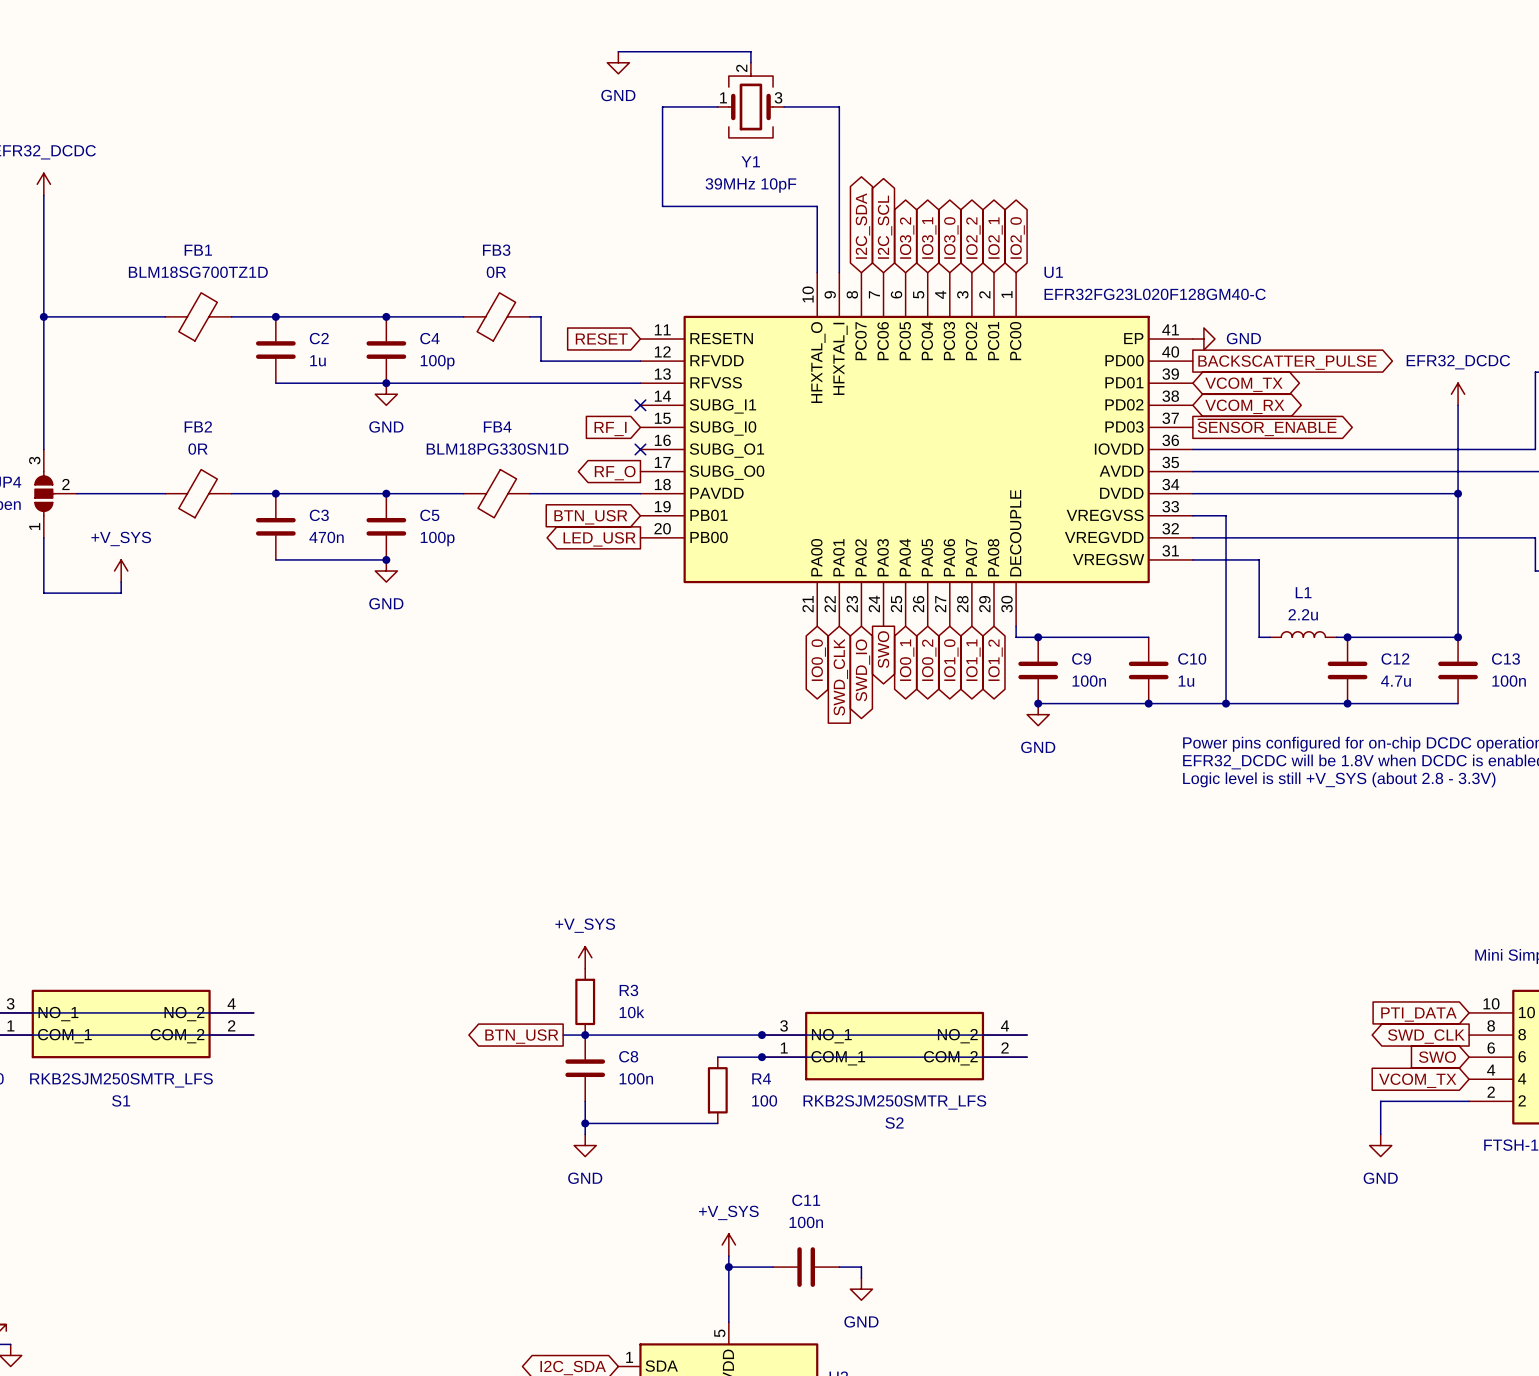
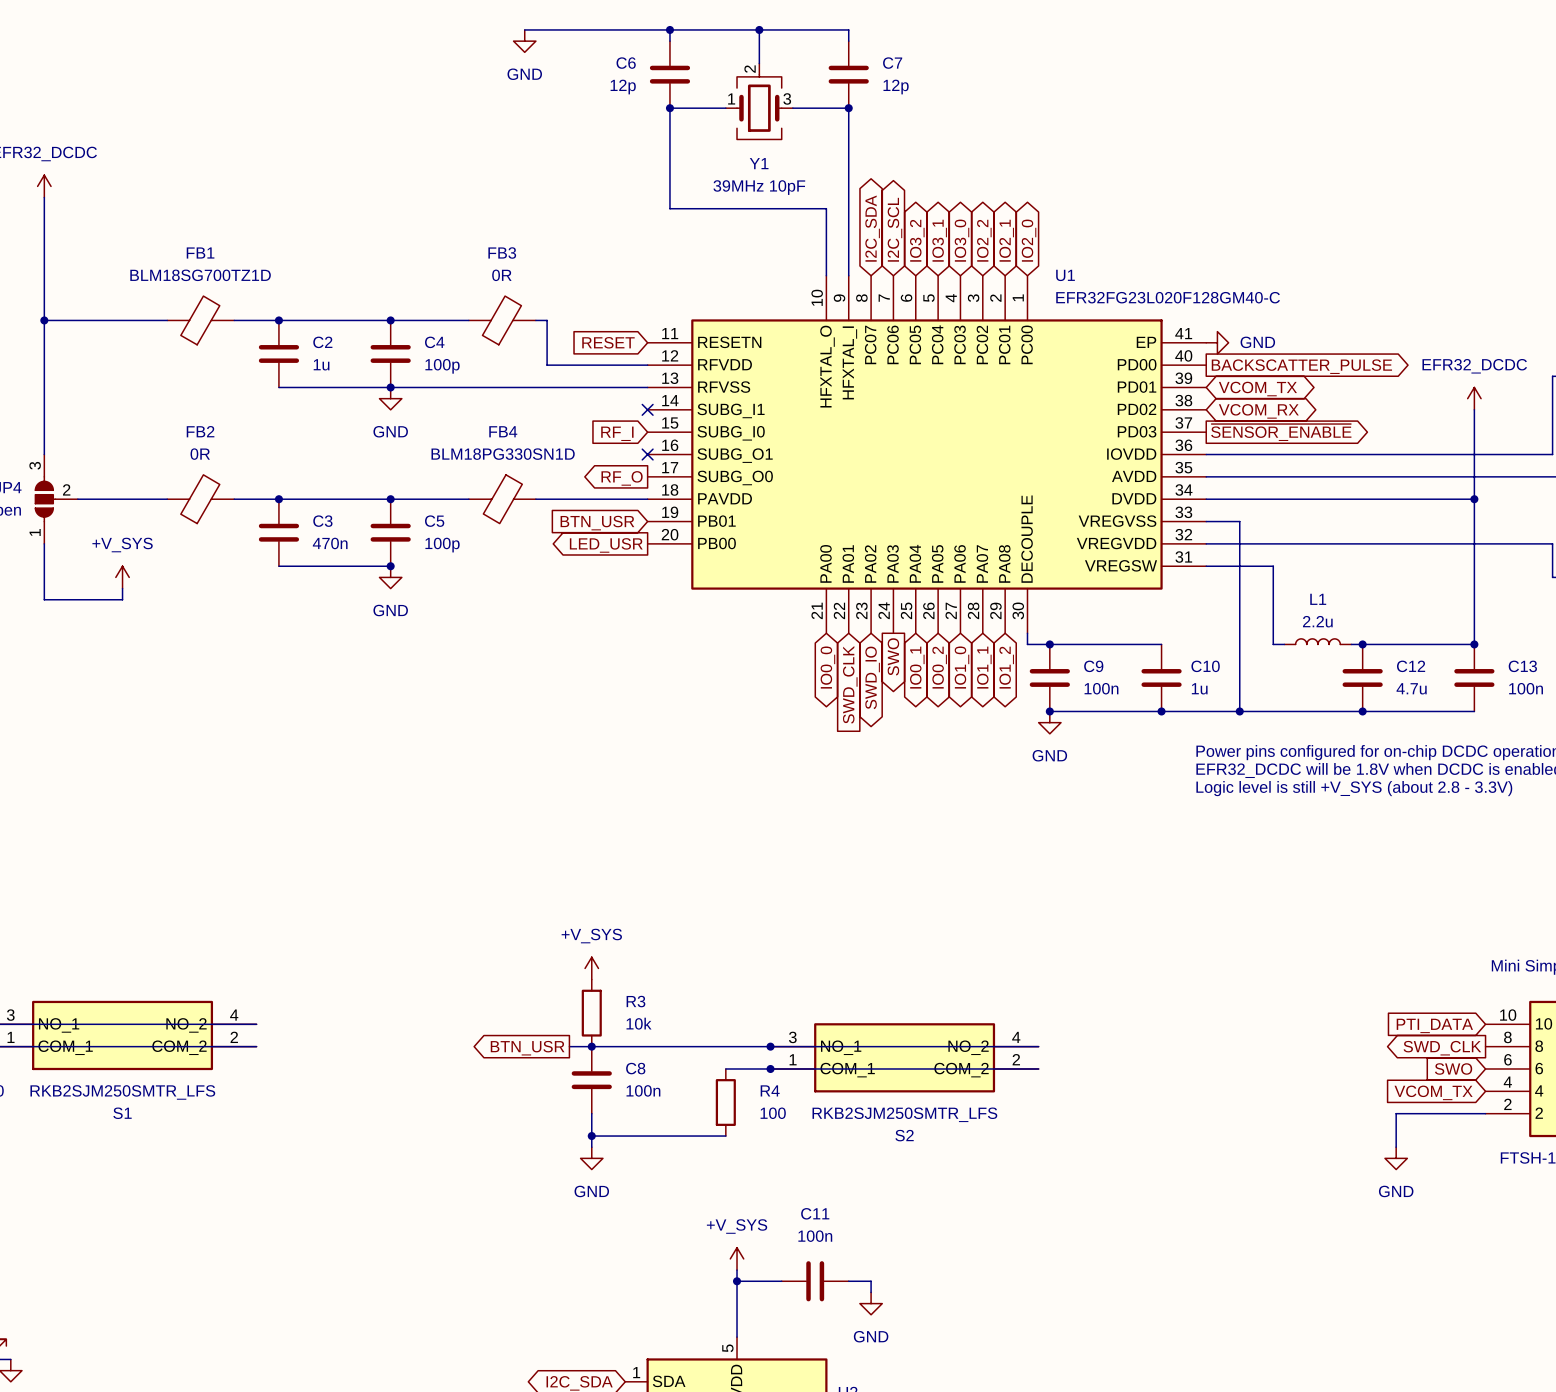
wire: none -> (524, 29) (848, 29) (848, 41)
wire: none -> (669, 29) (669, 41)
junction: none -> (669, 29)
junction: none -> (759, 29)
wire: (618, 51) (750, 51) -> (759, 29) (759, 52)
power symbol position: GND (618, 62) -> GND (524, 41)
C6: none -> 12p (669, 74)
C7: none -> 12p (848, 74)
junction: none -> (669, 108)
junction: none -> (848, 108)

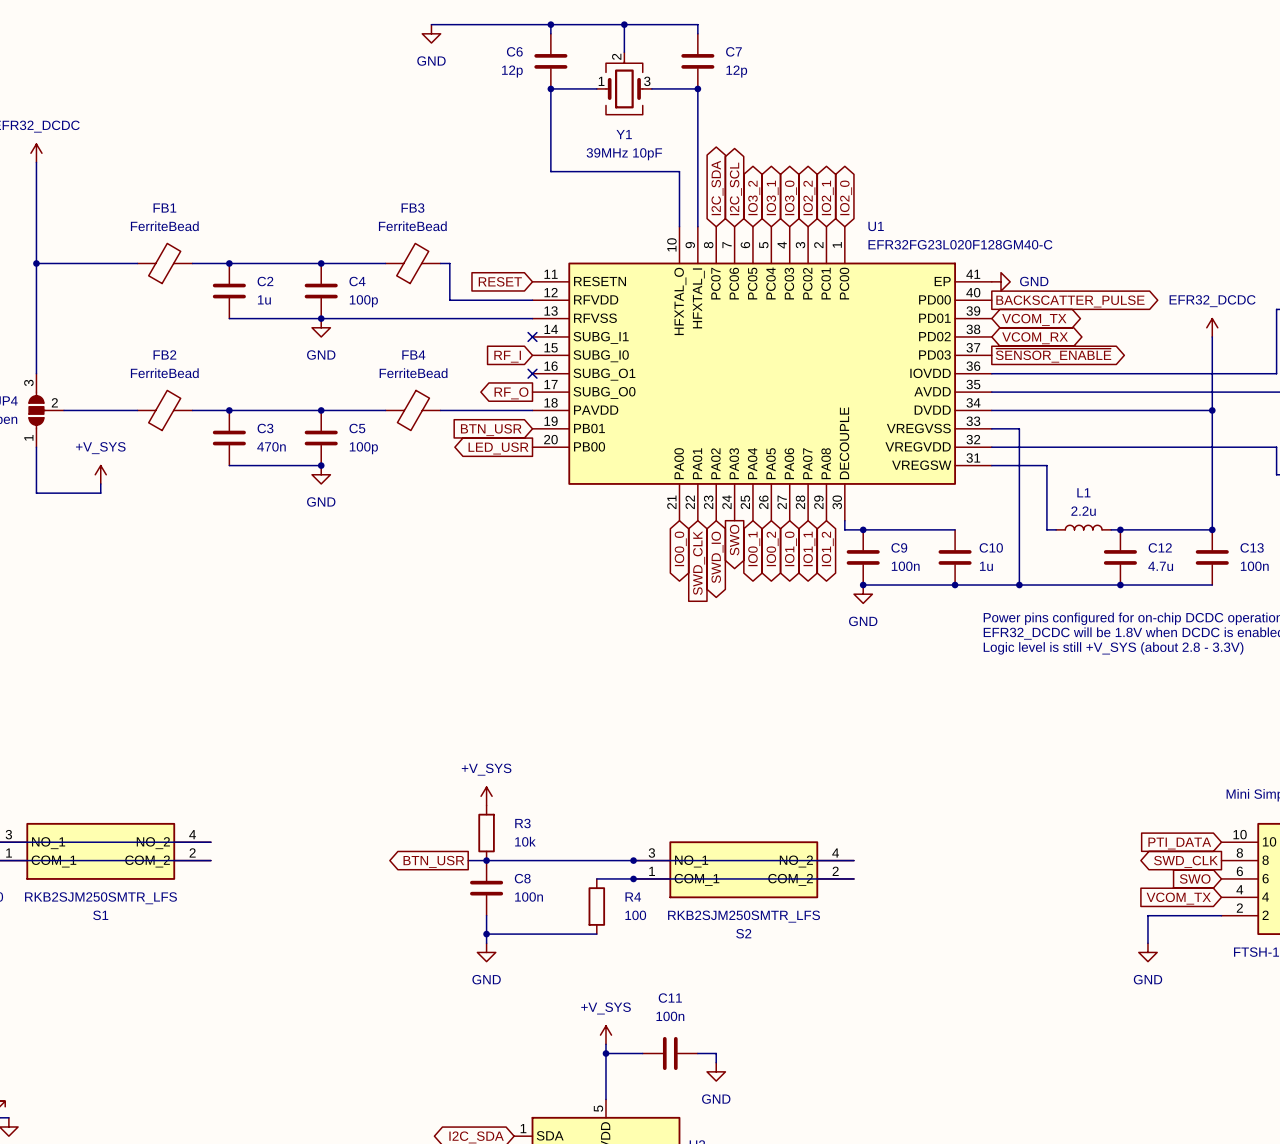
FB1 value: BLM18SG700TZ1D (200, 275) -> FerriteBead (164, 226)
FB3 value: 0R (501, 275) -> FerriteBead (412, 226)
FB2 value: 0R (200, 454) -> FerriteBead (164, 373)
FB4 value: BLM18PG330SN1D (503, 454) -> FerriteBead (413, 373)

